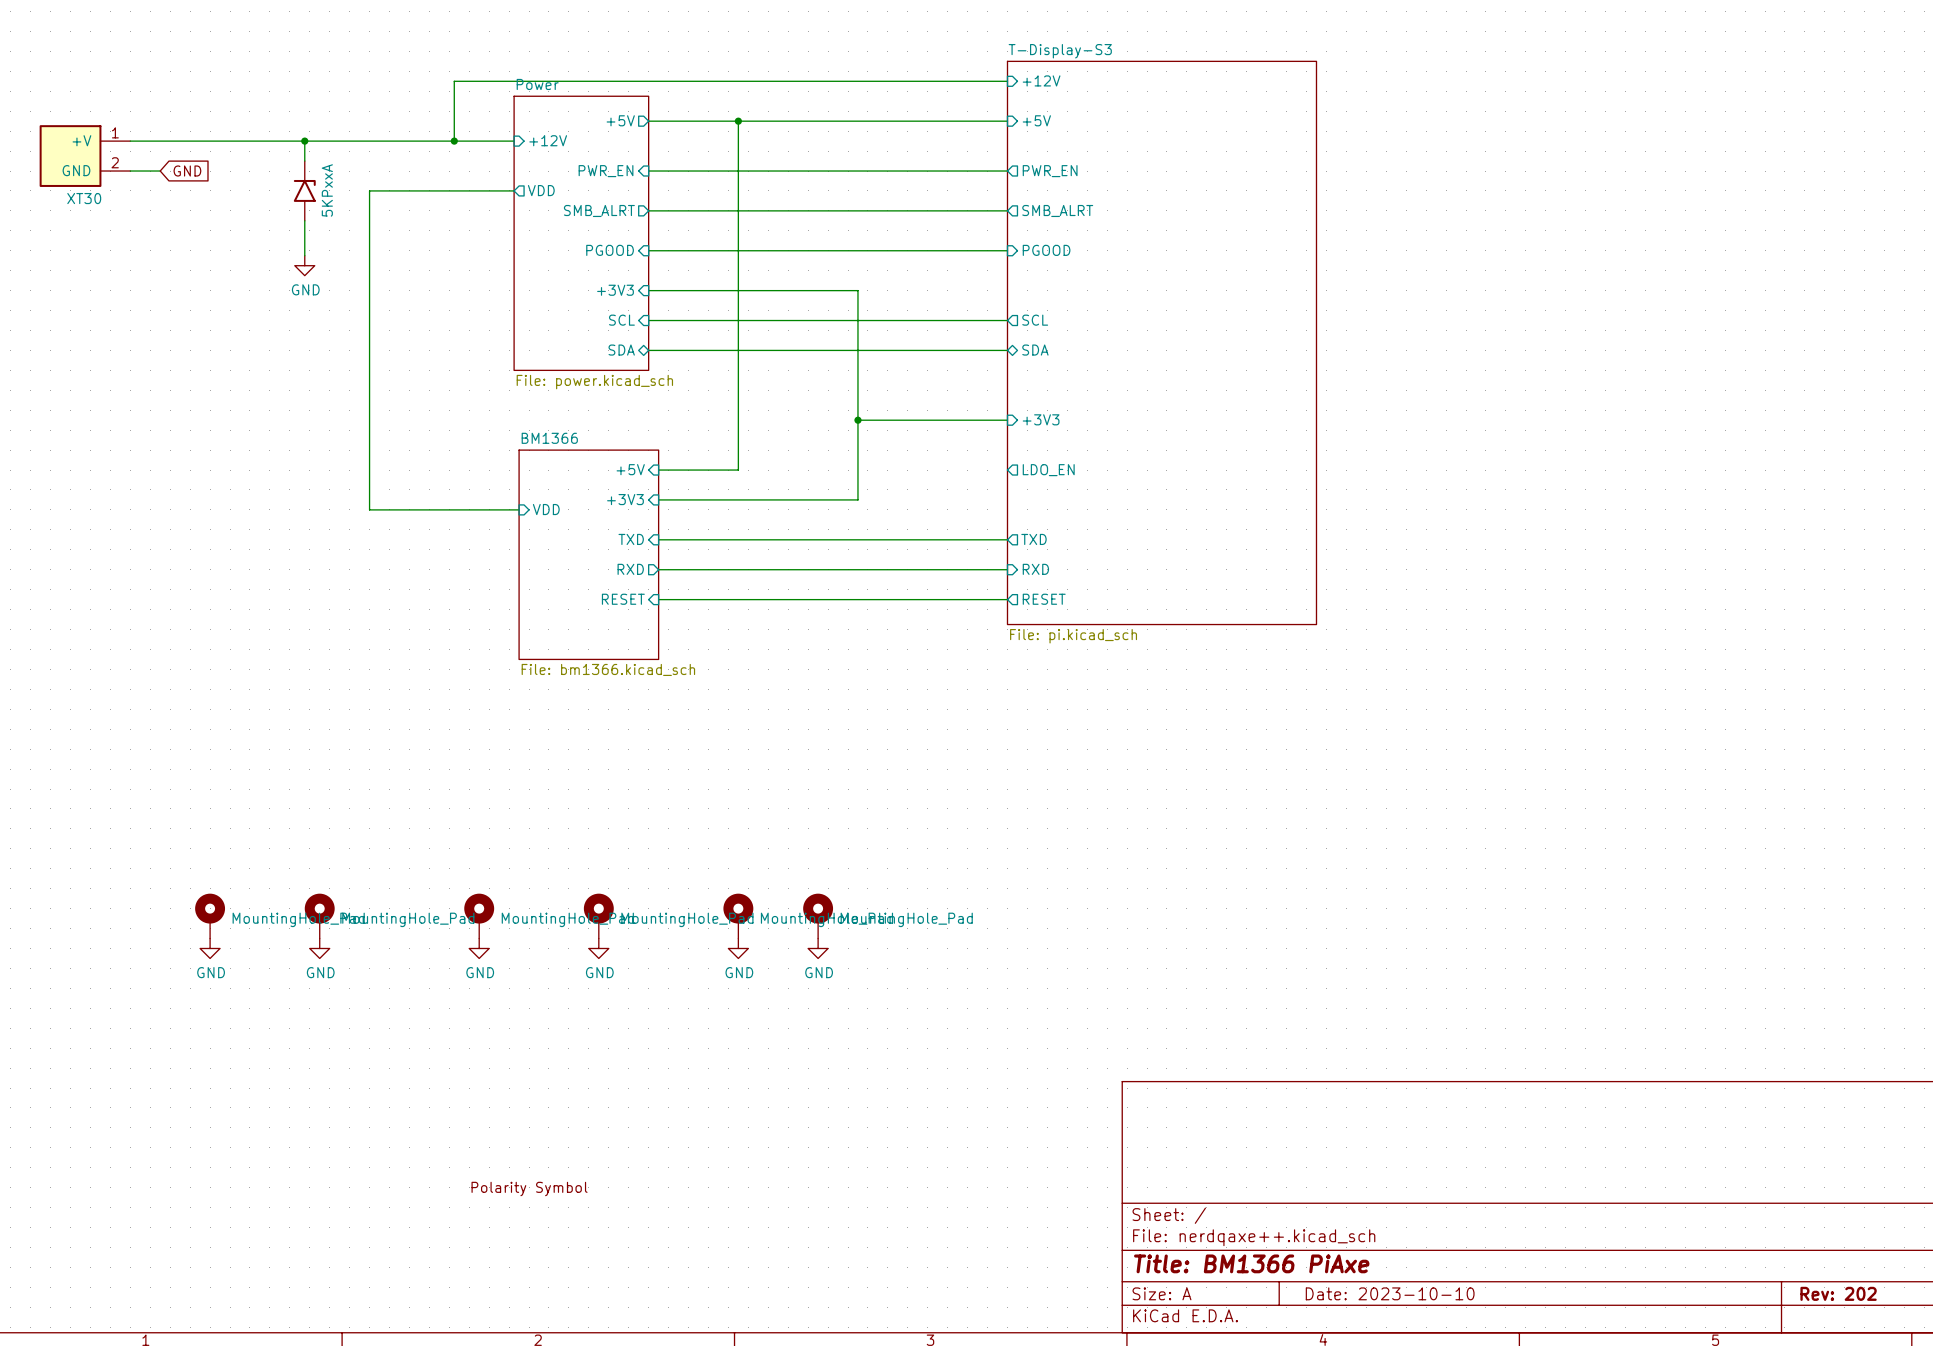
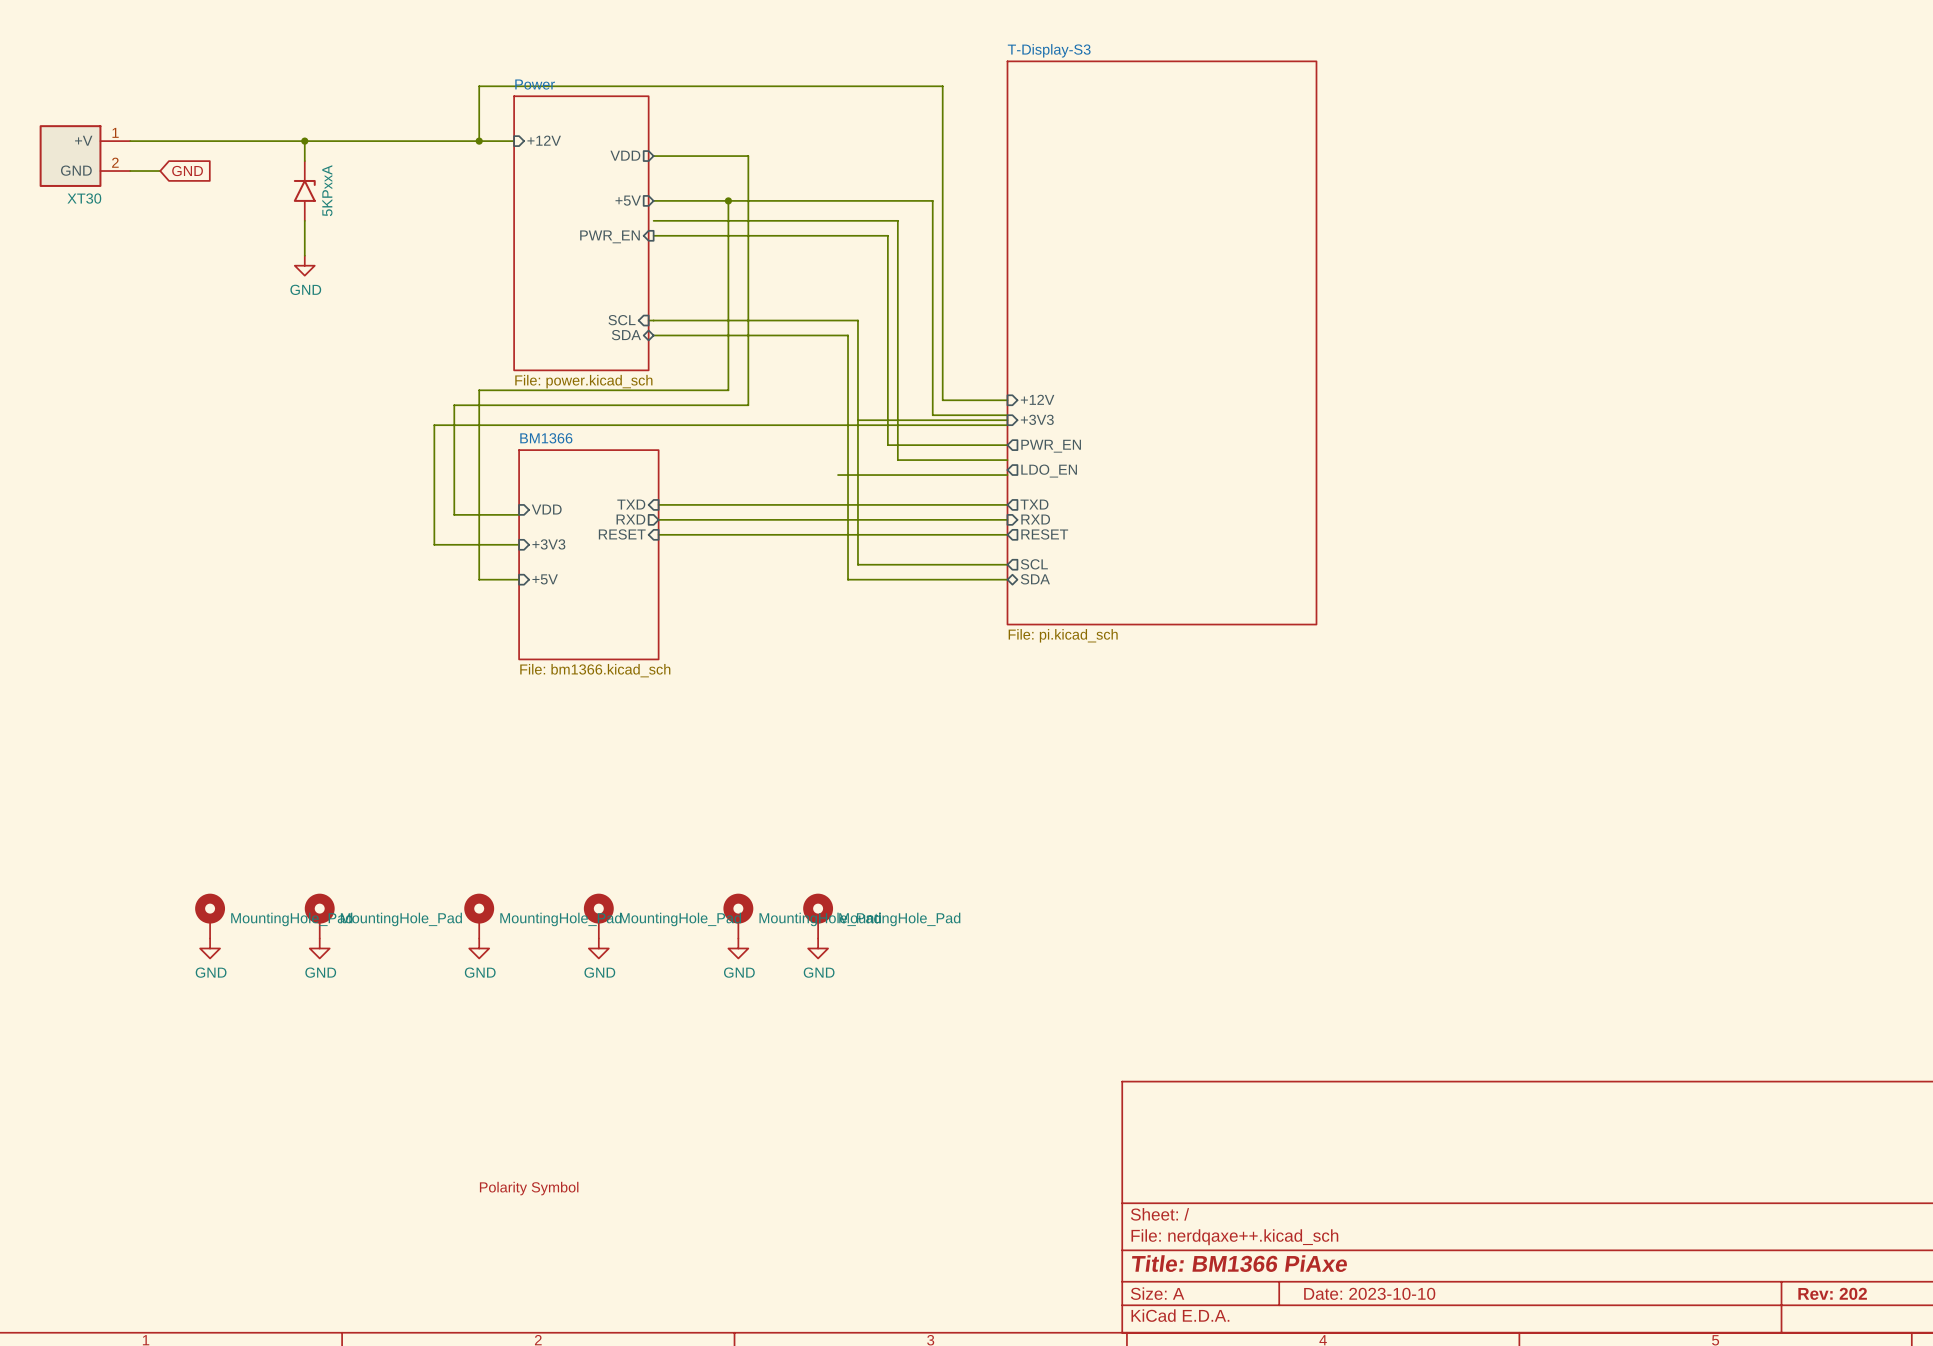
sheet pin: +12V (1041, 80) -> none
wire: (1007, 81) (454, 81) (454, 141) -> none
sheet pin position: +5V (620, 120) -> +5V (628, 200)
sheet pin: +5V (1036, 120) -> none
wire: (648, 121) (1007, 121) -> none
wire: (738, 121) (738, 470) (658, 470) -> none
junction: (738, 121) -> none
junction position: (454, 141) -> (479, 141)
wire: none -> (479, 141) (479, 86) (942, 86) (942, 400) (1007, 400)
wire: none -> (653, 156) (748, 156) (748, 405) (454, 405) (454, 514) (519, 514)
sheet pin position: PWR_EN (606, 171) -> PWR_EN (609, 236)
wire: (648, 171) (1007, 171) -> none
sheet pin: PWR_EN (1050, 171) -> none
wire: (514, 190) (369, 190) (369, 509) (519, 509) -> none
sheet pin rotation: 0° (541, 190) -> 180° (625, 155)
sheet pin position: VDD (541, 190) -> VDD (625, 155)
wire: none -> (653, 200) (932, 200) (932, 415) (1007, 415)
wire: none -> (728, 200) (728, 390) (479, 390) (479, 579) (519, 579)
junction: none -> (728, 200)
sheet pin: SMB_ALRT (599, 210) -> none
wire: (648, 210) (1007, 210) -> none
sheet pin: SMB_ALRT (1057, 210) -> none
wire: none -> (653, 220) (897, 220) (897, 460) (1007, 460)
wire: none -> (653, 235) (887, 235) (887, 445) (1007, 445)
sheet pin: PGOOD (610, 250) -> none
wire: (648, 250) (1007, 250) -> none
sheet pin: PGOOD (1046, 250) -> none
sheet pin: +3V3 (615, 290) -> none
wire: (648, 290) (857, 290) (857, 320) (1007, 320) -> none
sheet pin: SCL (1035, 320) -> none
wire: none -> (653, 335) (848, 335) (848, 579) (1007, 579)
sheet pin position: SDA (621, 350) -> SDA (626, 335)
wire: (648, 350) (1007, 350) -> none
sheet pin: SDA (1035, 350) -> none
sheet pin: none -> +12V (1037, 399)
junction: (857, 420) -> none
wire: none -> (1007, 425) (434, 425) (434, 544) (519, 544)
sheet pin: none -> PWR_EN (1051, 446)
sheet pin: +5V (630, 469) -> none
wire: none -> (838, 475) (1007, 475)
sheet pin rotation: 0° (625, 499) -> 180° (548, 544)
sheet pin position: +3V3 (625, 499) -> +3V3 (548, 544)
wire: (658, 499) (857, 499) -> (1007, 564) (857, 564) (857, 499)
sheet pin position: TXD (631, 539) -> TXD (631, 504)
wire: (658, 539) (1007, 539) -> (658, 504) (1007, 504)
sheet pin position: TXD (1033, 539) -> TXD (1034, 504)
sheet pin: none -> SCL (1034, 564)
sheet pin position: RXD (630, 569) -> RXD (630, 519)
wire: (658, 569) (1007, 569) -> (658, 534) (1007, 534)
sheet pin position: RXD (1035, 569) -> RXD (1035, 519)
sheet pin: none -> +5V (545, 579)
sheet pin: none -> SDA (1035, 579)
sheet pin position: RESET (623, 599) -> RESET (622, 534)
wire: (658, 599) (1007, 599) -> (658, 519) (1007, 519)
sheet pin position: RESET (1044, 599) -> RESET (1044, 534)

